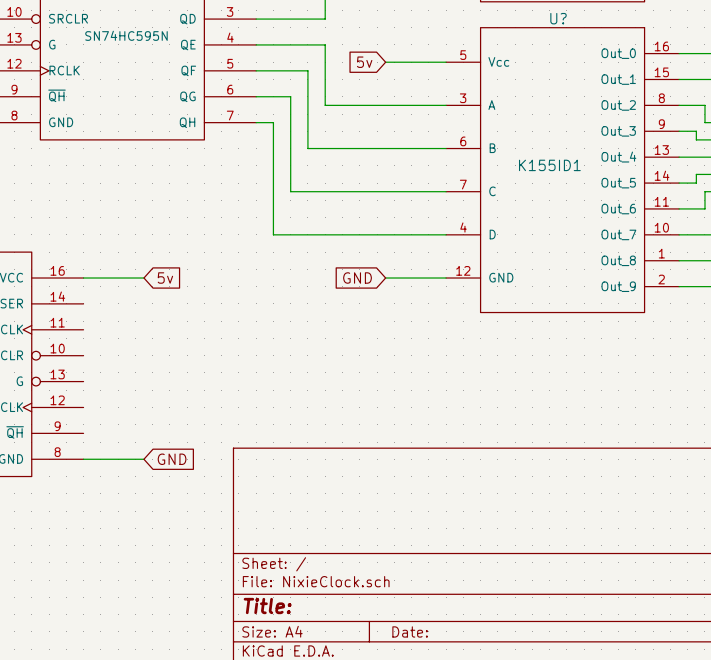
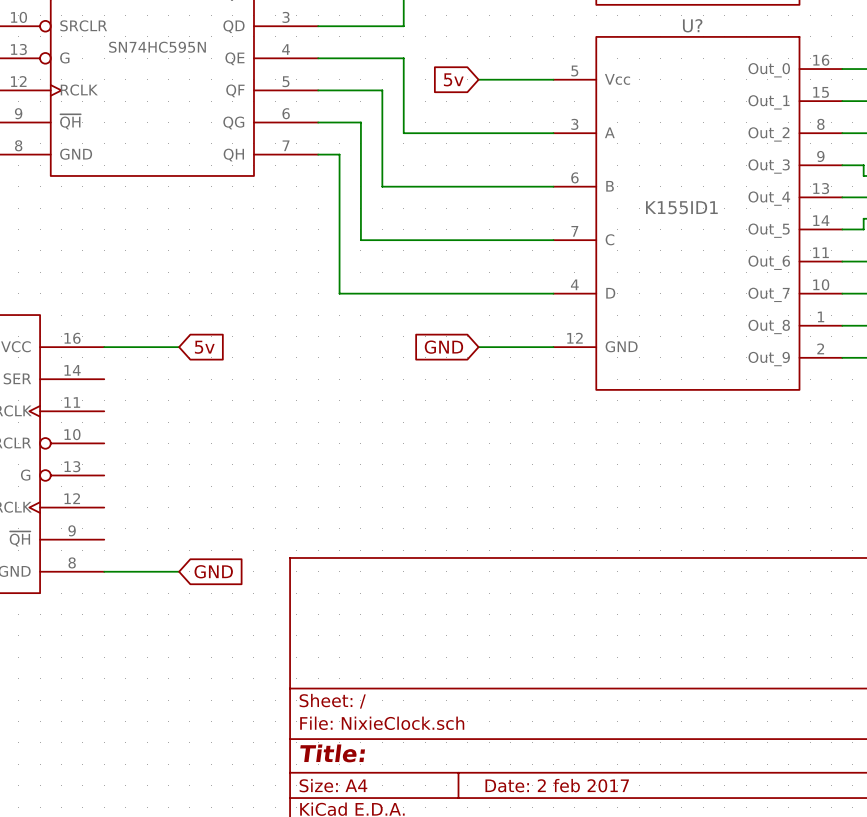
title block: Date: (410, 631) -> Date: 2 feb 2017 (557, 785)

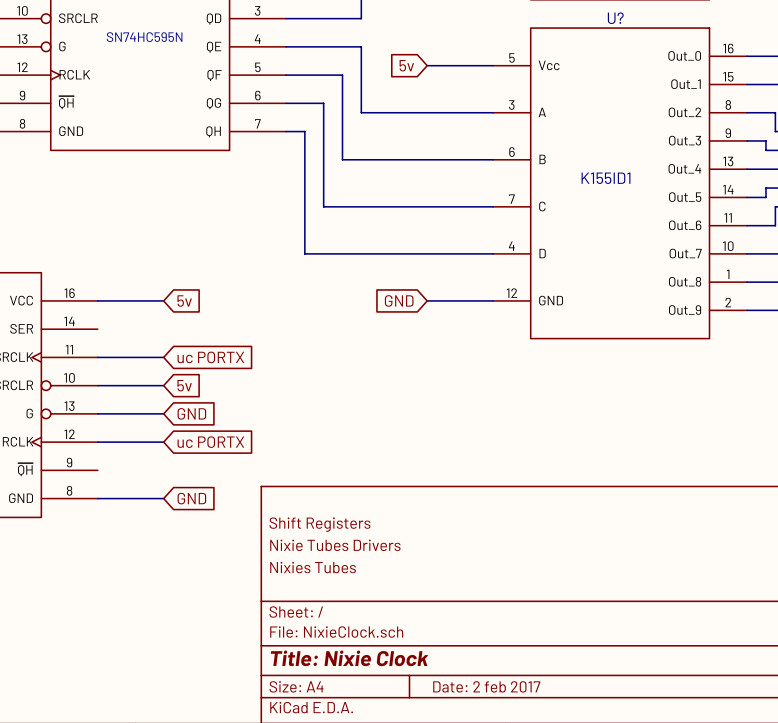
wire: none -> (97, 357) (163, 357)
global label: none -> uc PORTX (210, 357)
wire: none -> (97, 385) (163, 385)
global label: none -> 5v (184, 385)
wire: none -> (97, 413) (163, 413)
global label: none -> GND (191, 413)
wire: none -> (97, 442) (163, 442)
global label: none -> uc PORTX (210, 442)
title block: none -> Shift Registers (319, 524)
title block: none -> Nixie Tubes Drivers (335, 545)
title block: none -> Nixies Tubes (313, 567)
title block: Title: (332, 753) -> Title: Nixie Clock (349, 658)

